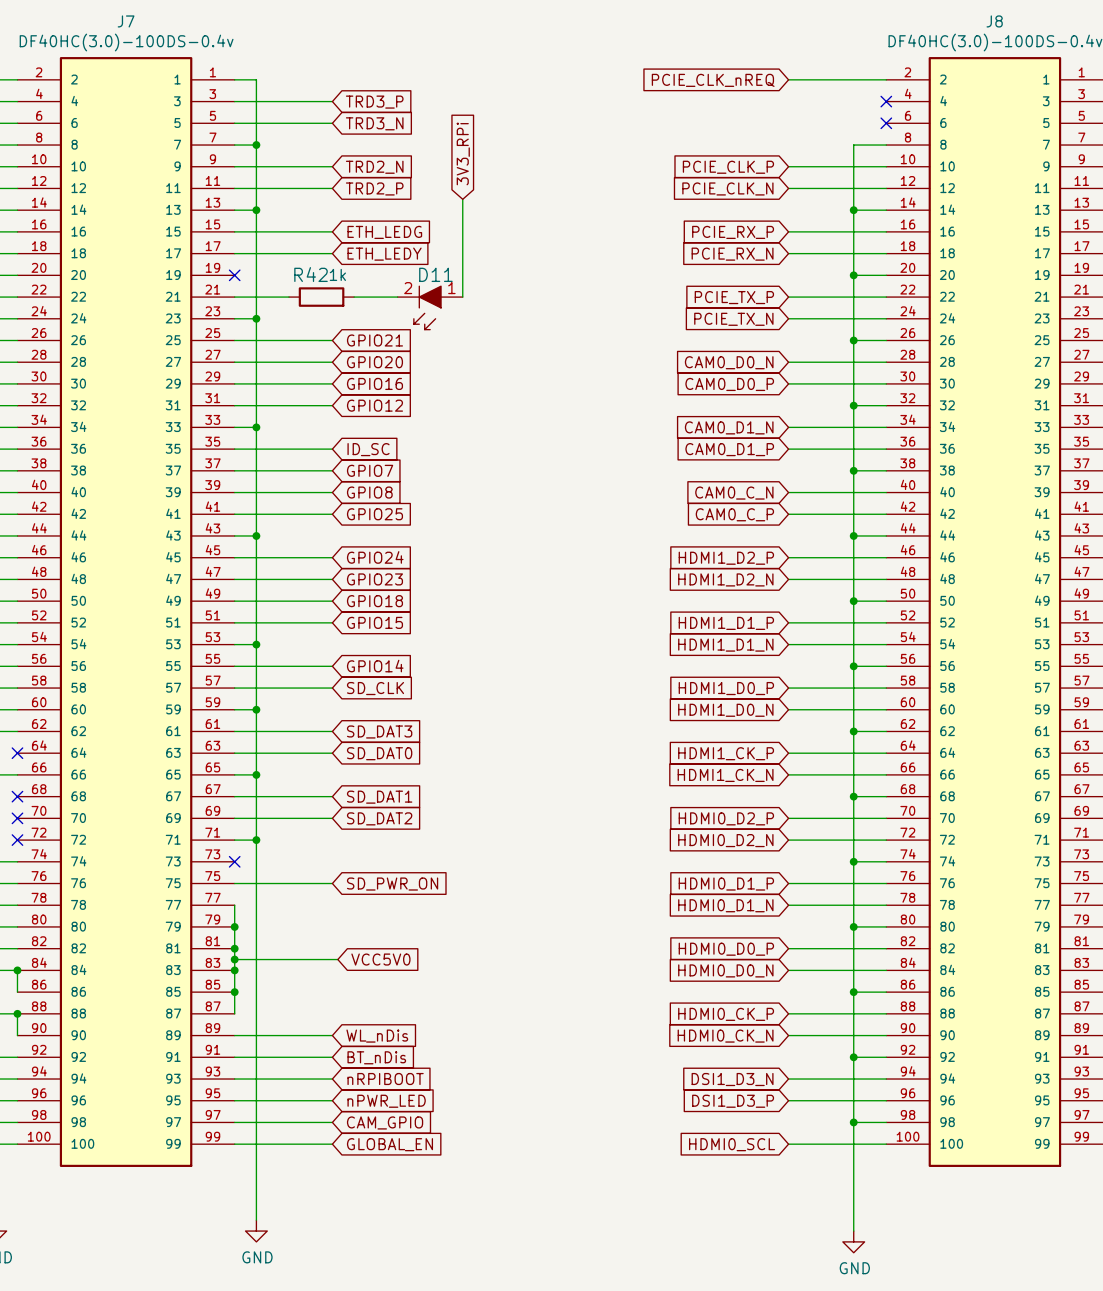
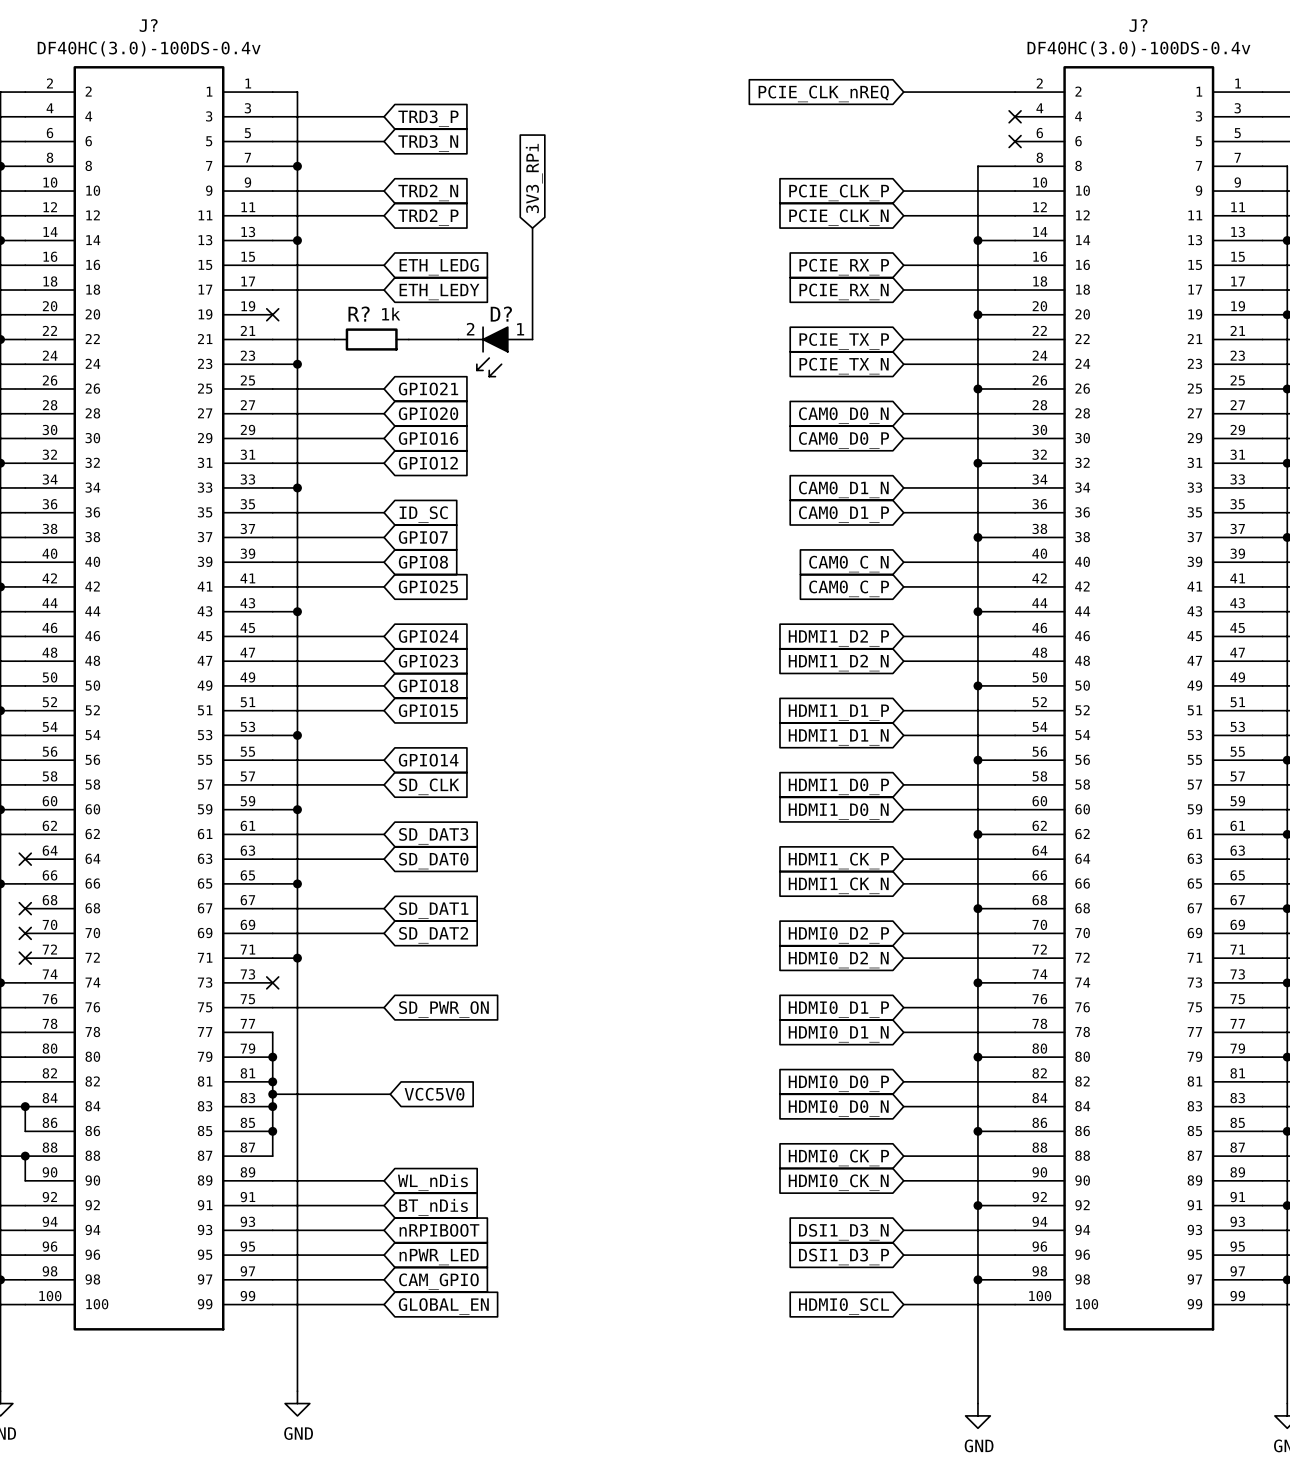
J7 name: J7 (126, 21) -> J? (148, 25)
J8 name: J8 (994, 21) -> J? (1138, 25)
R42 name: R42 (311, 274) -> R? (359, 314)
D11 name: D11 (435, 274) -> D? (501, 314)

